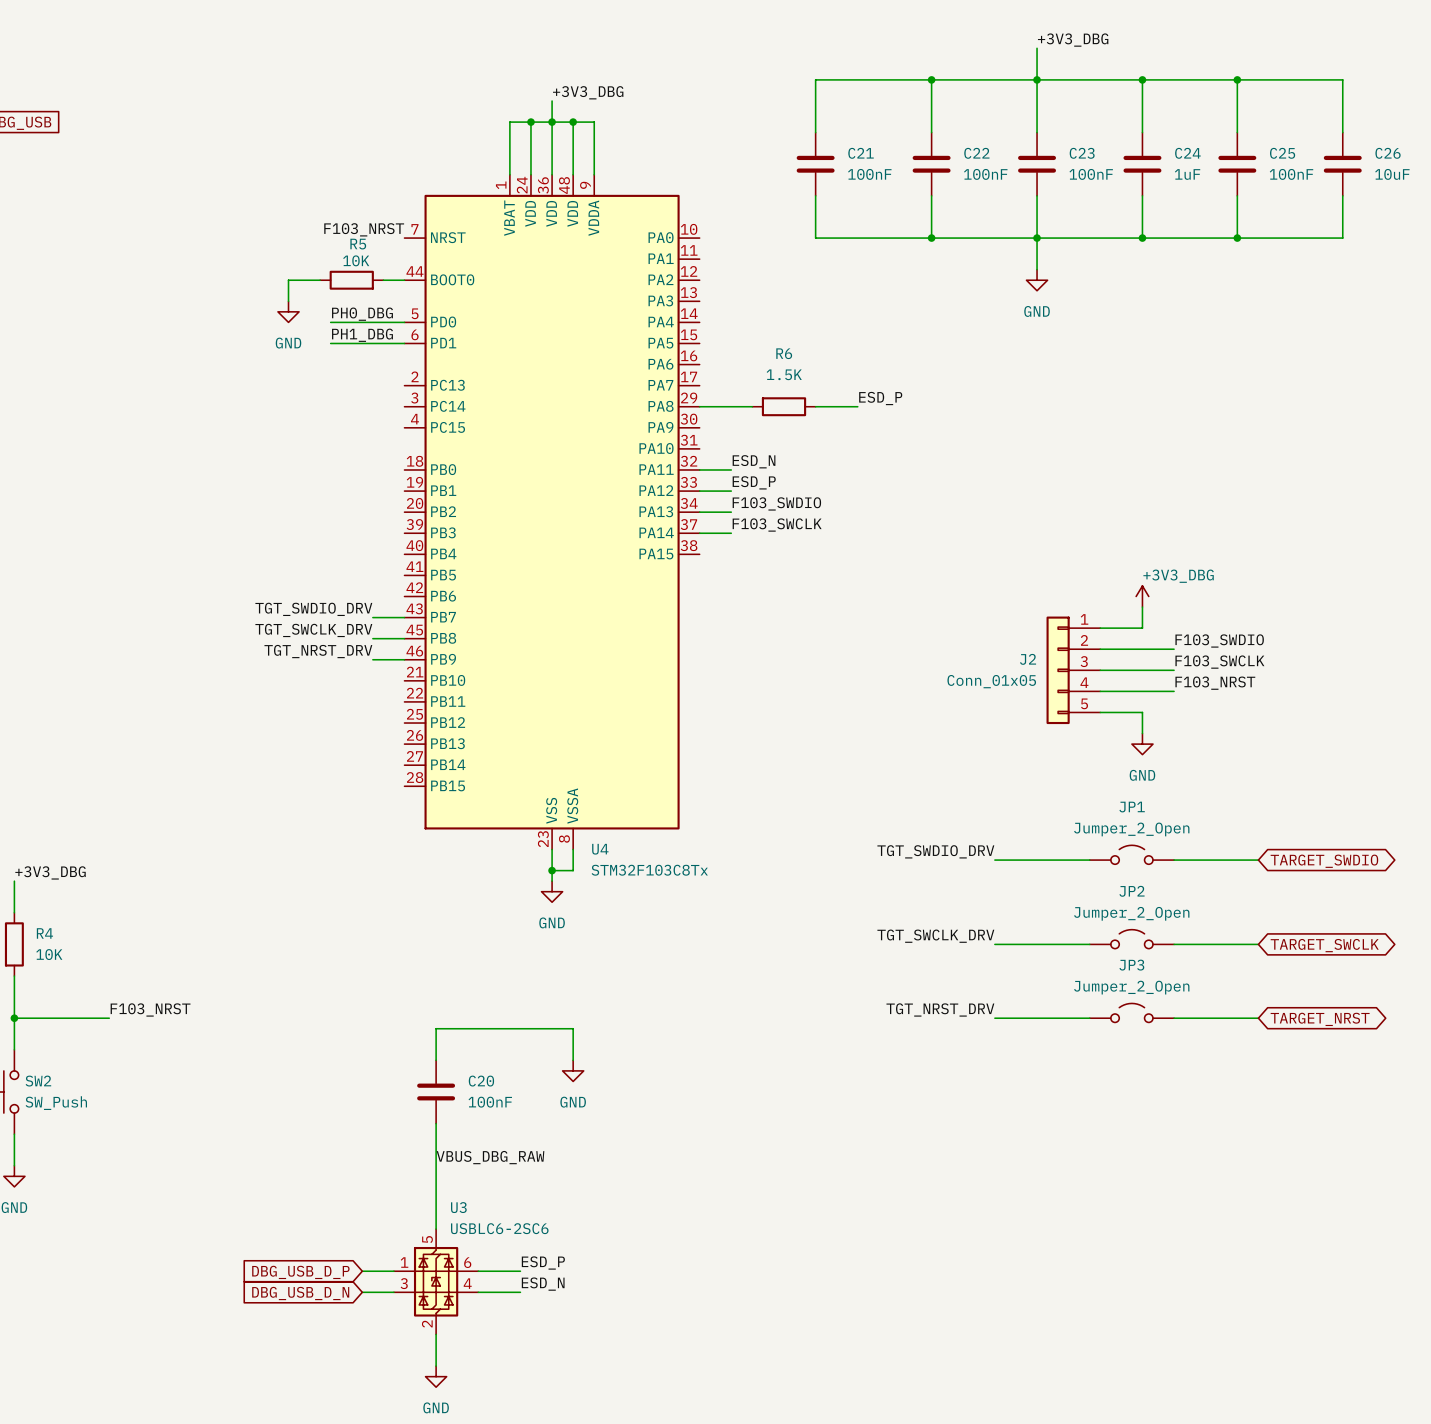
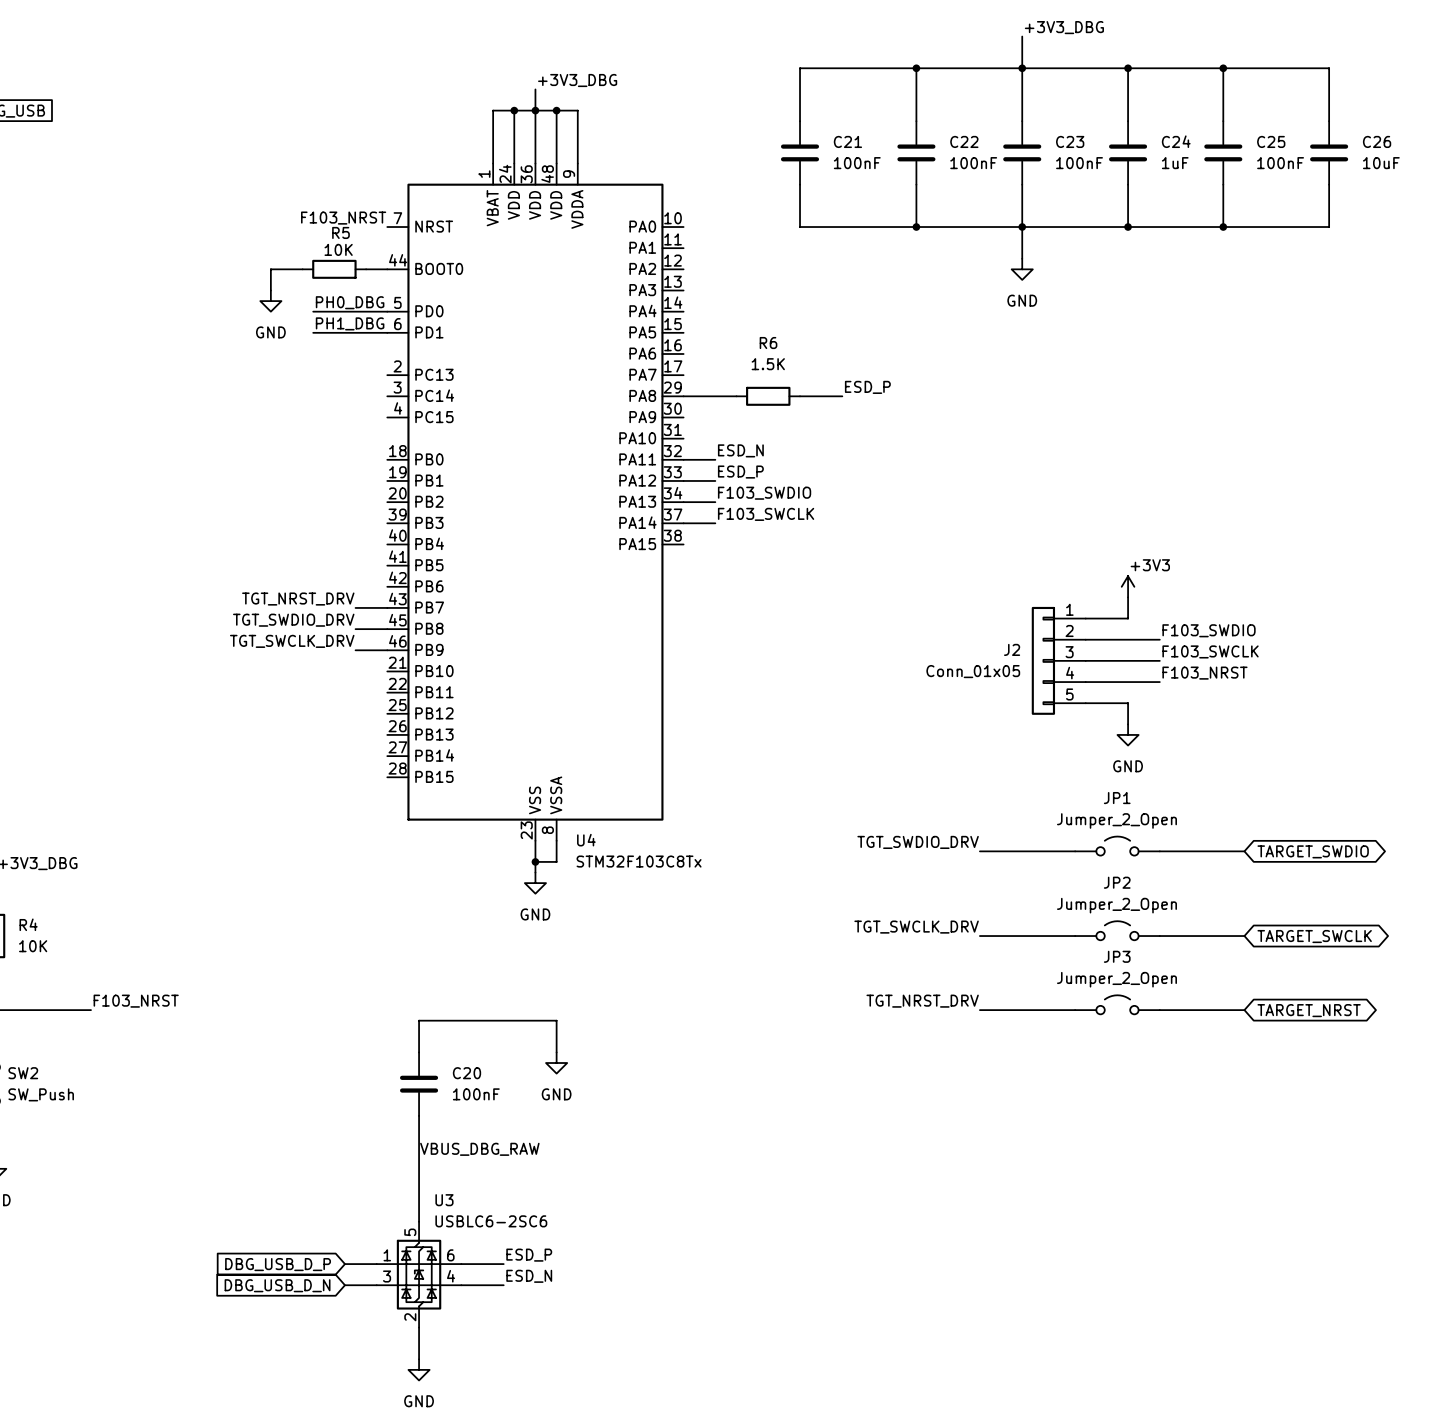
power symbol: +3V3_DBG (1142, 596) -> +3V3 (1128, 586)
label: TGT_SWDIO_DRV (313, 609) -> TGT_NRST_DRV (298, 599)
label: TGT_SWCLK_DRV (313, 630) -> TGT_SWDIO_DRV (293, 620)
label: TGT_NRST_DRV (318, 651) -> TGT_SWCLK_DRV (292, 641)

